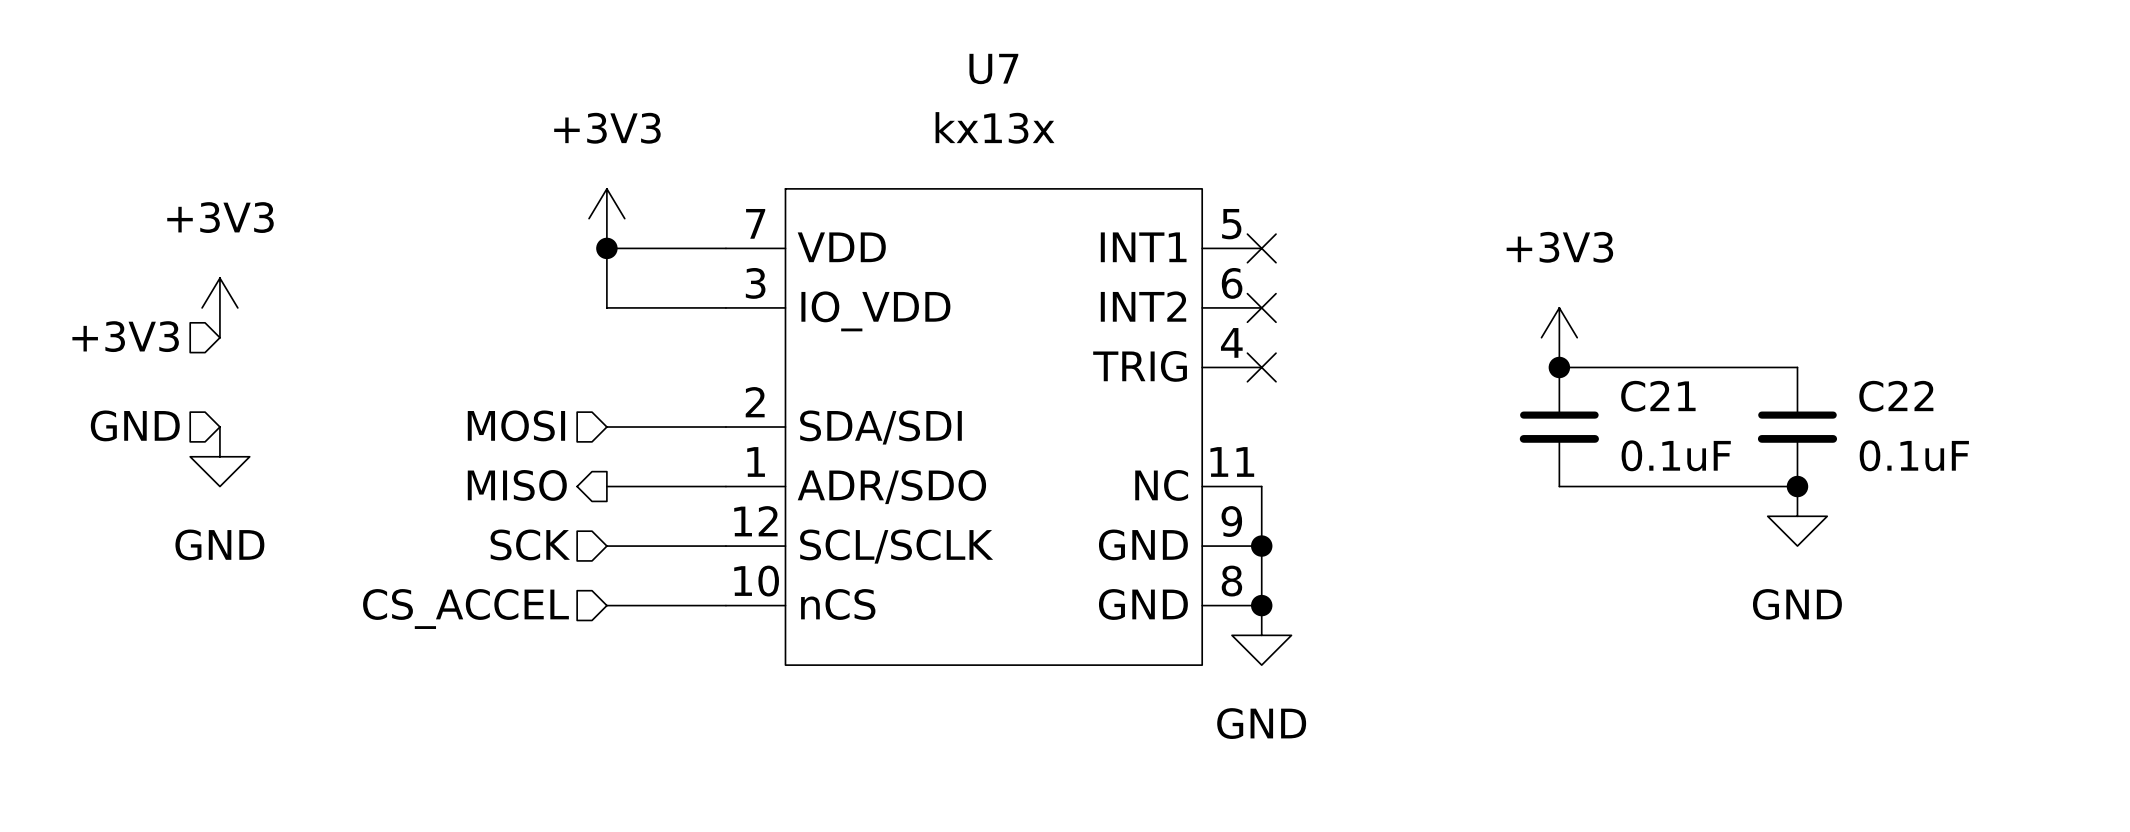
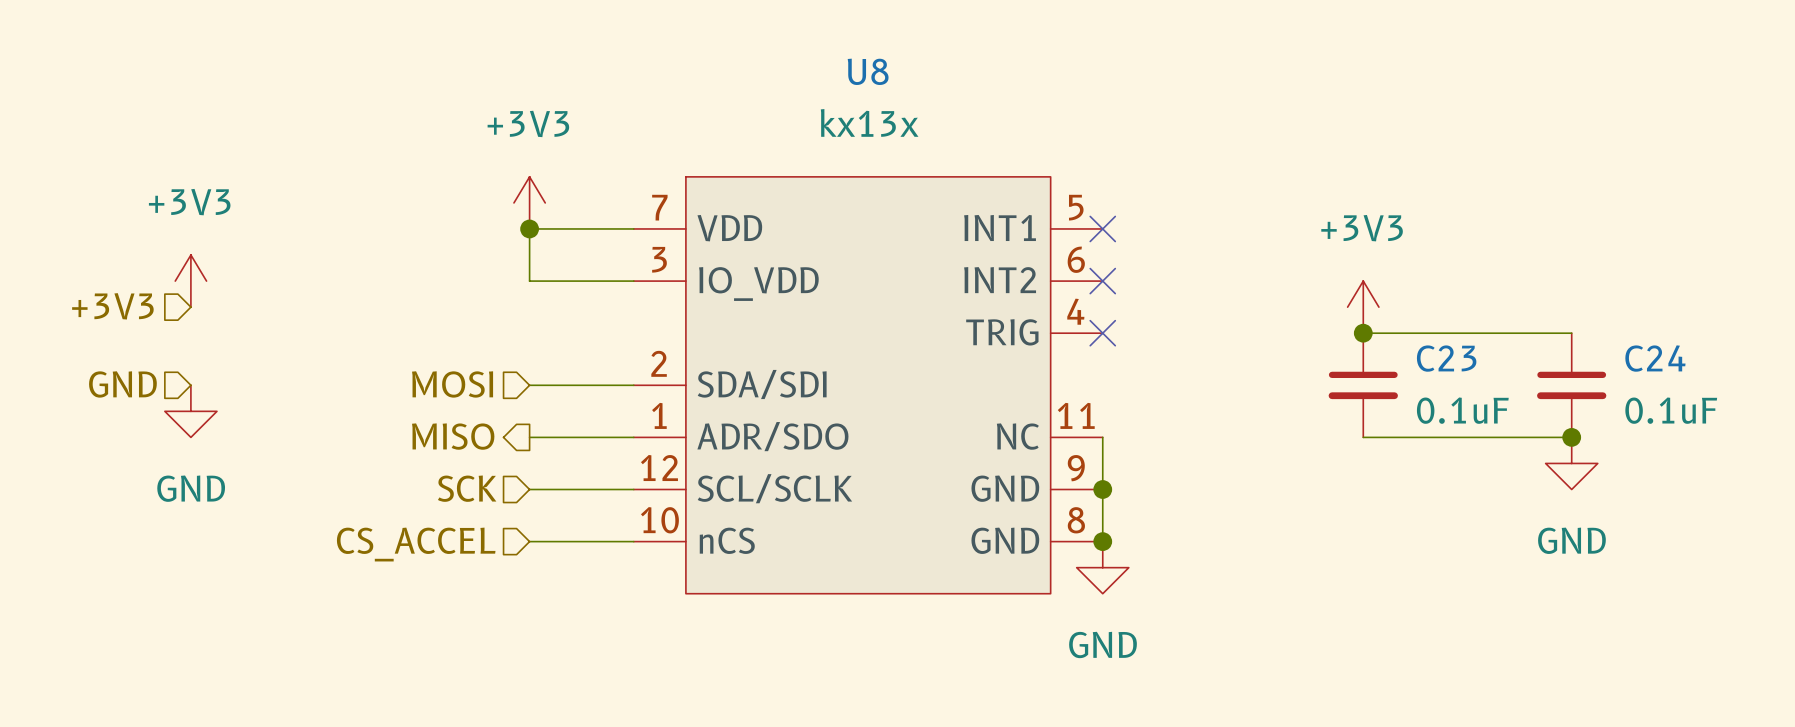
U7 name: U7 (993, 69) -> U8 (868, 71)
C21 name: C21 (1658, 396) -> C23 (1446, 358)
C22 name: C22 (1896, 396) -> C24 (1655, 358)

